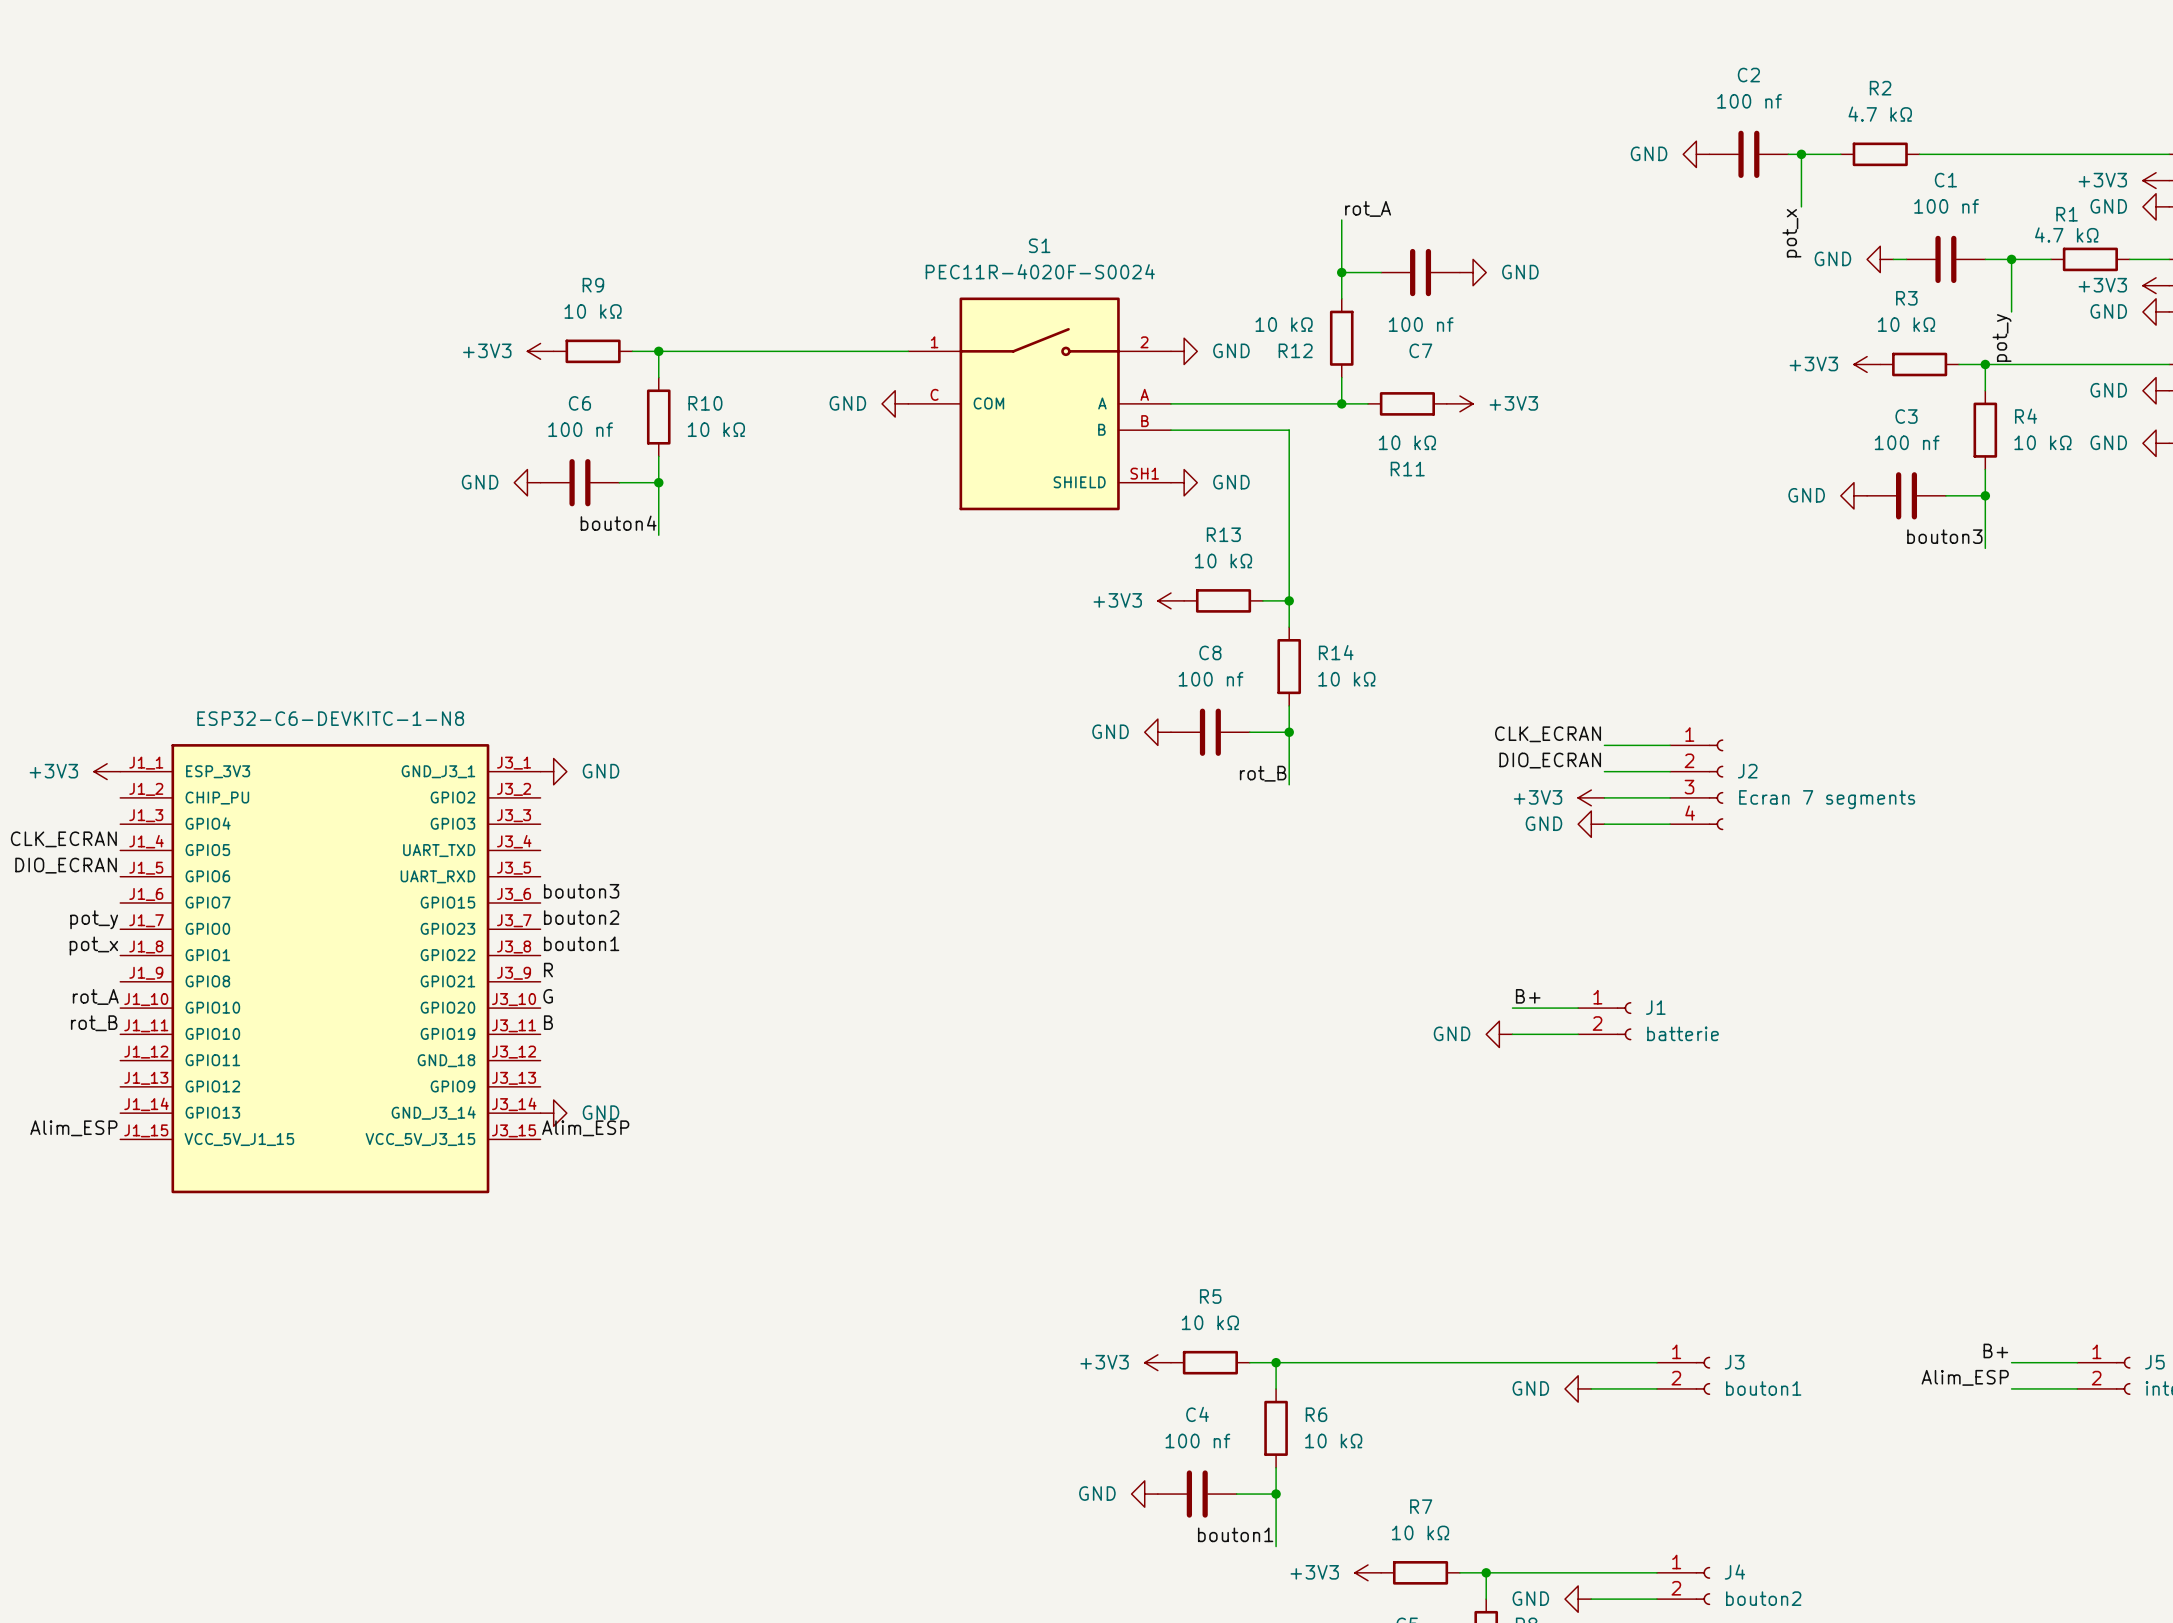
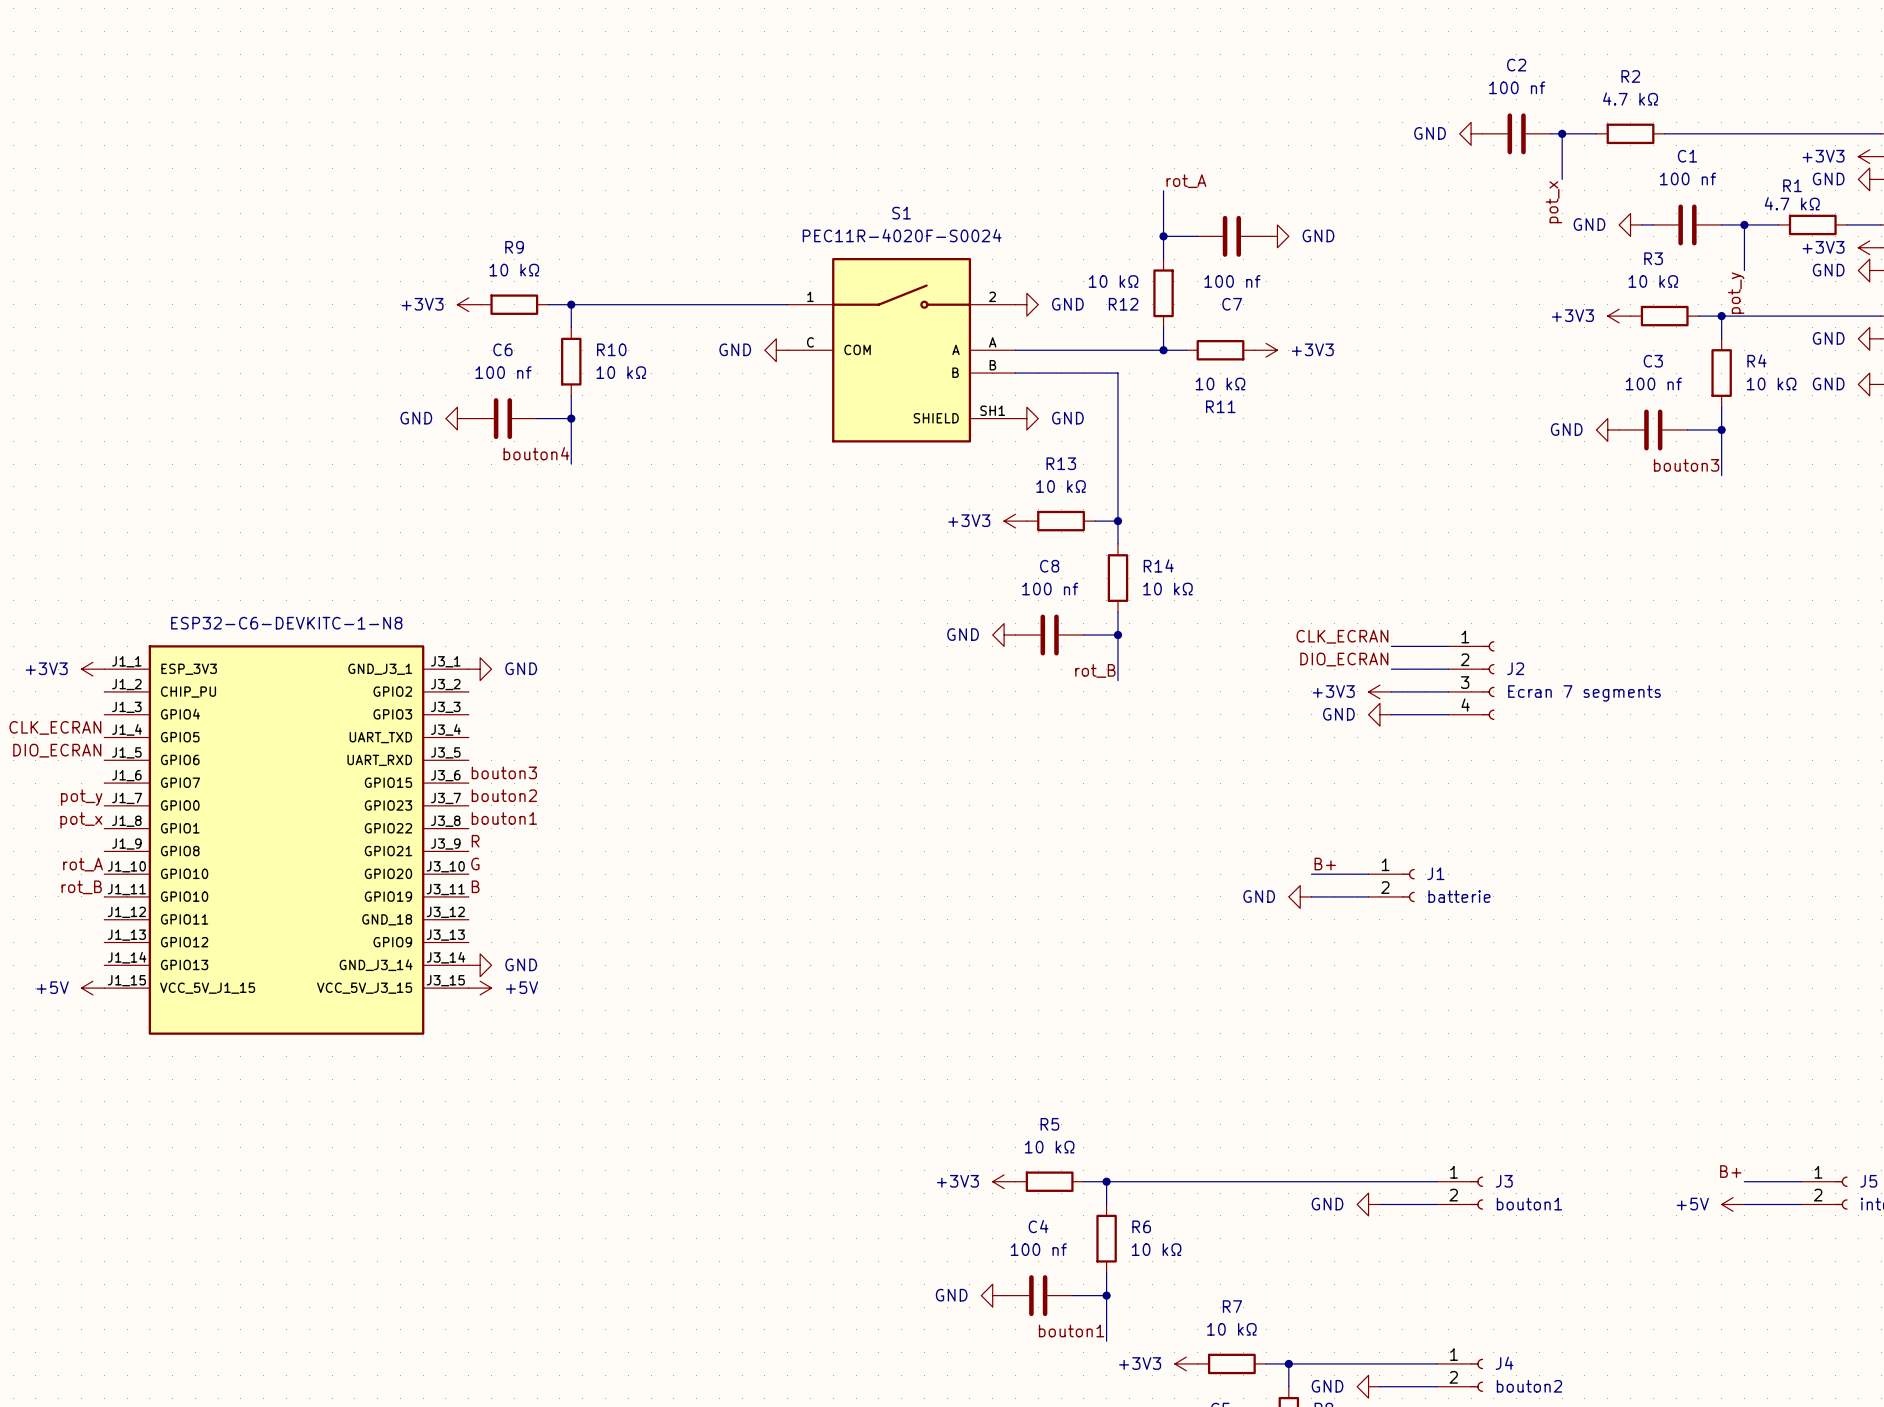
label: Alim_ESP (73, 1128) -> none
label: Alim_ESP (585, 1128) -> none
power symbol: none -> +5V (92, 988)
power symbol: none -> +5V (480, 988)
label: Alim_ESP (1965, 1377) -> none
power symbol: none -> +5V (1733, 1204)

